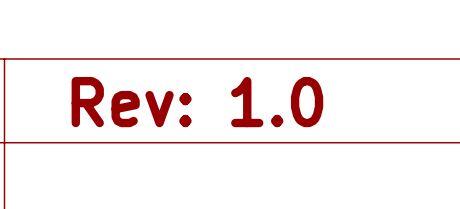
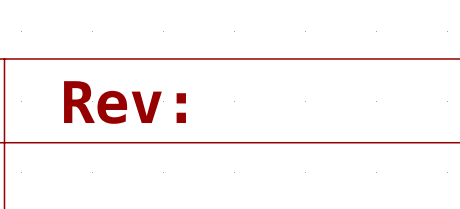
title block: Rev: 1.0 (197, 102) -> Rev: (125, 102)

